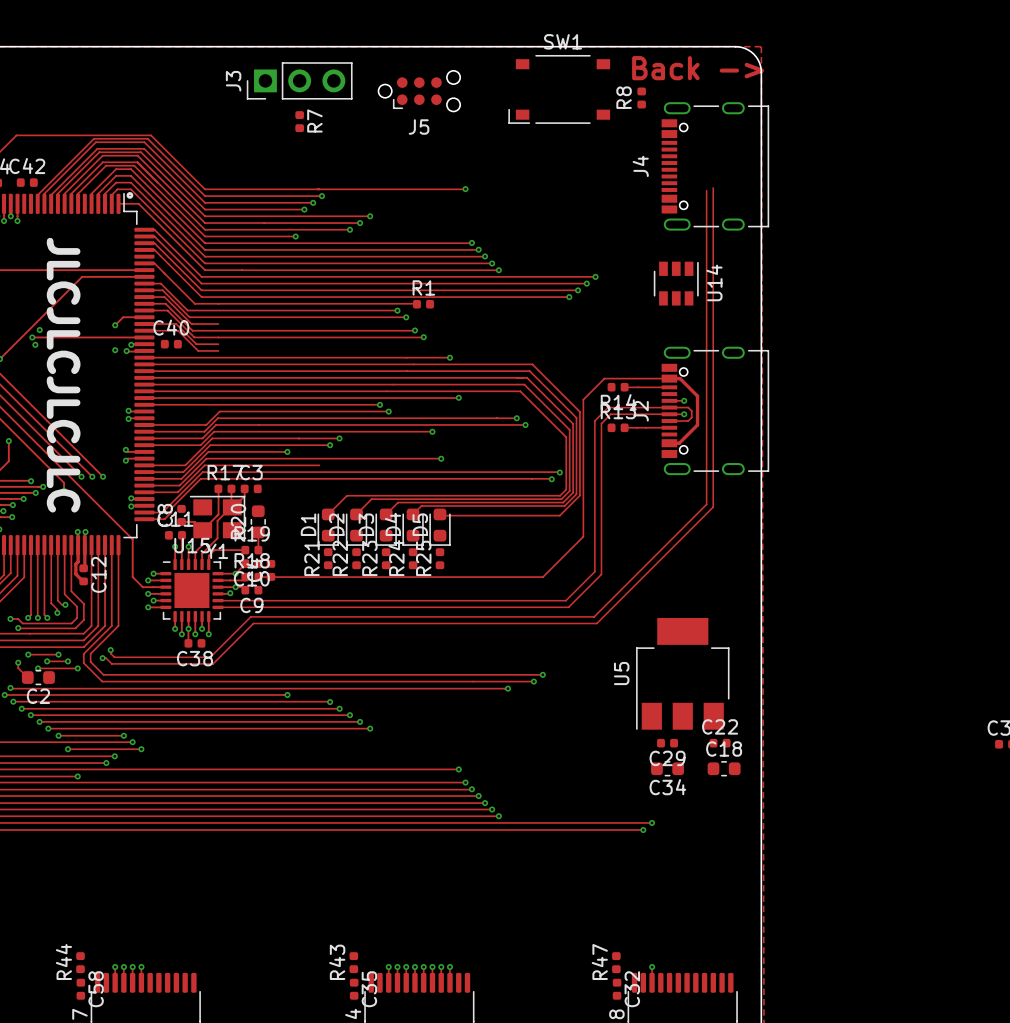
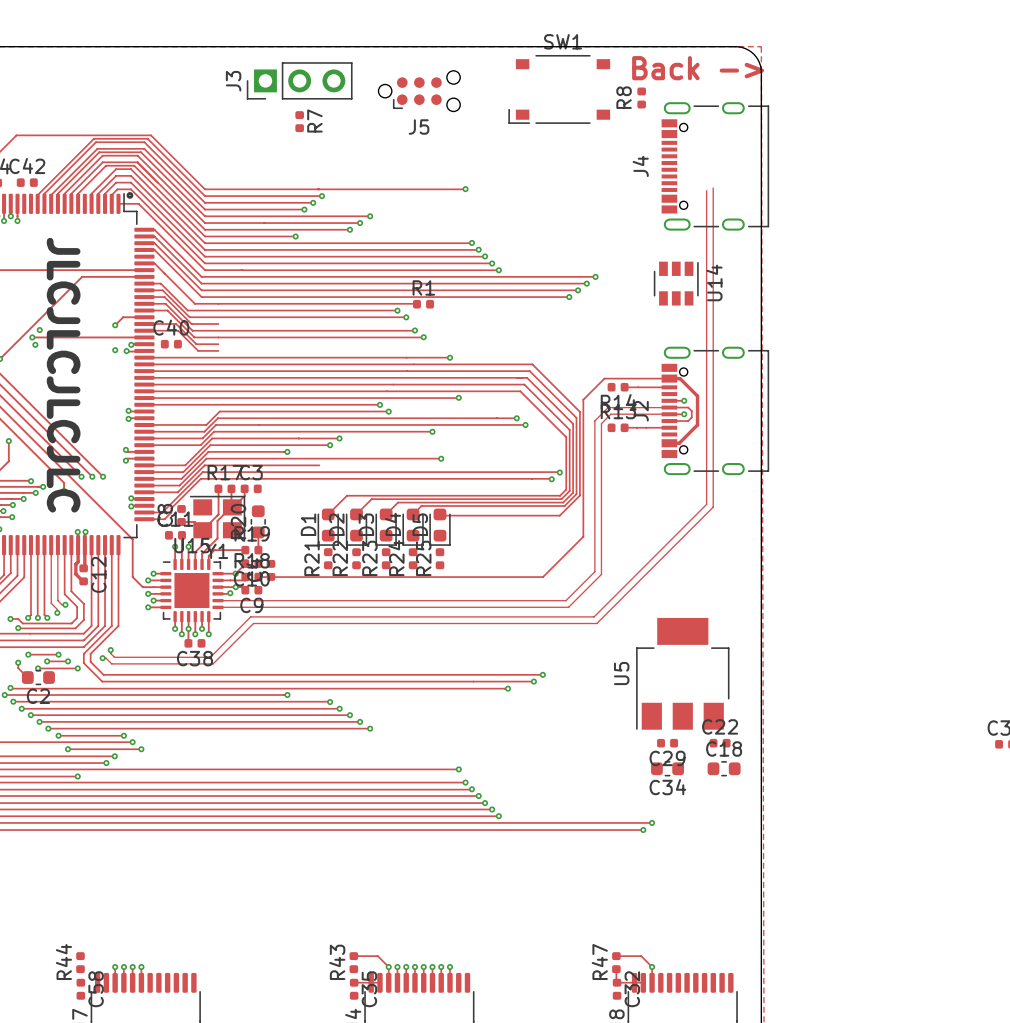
track: none -> (353, 956) (377, 956) (388, 967)
track: none -> (616, 956) (641, 956) (652, 967)
track: none -> (616, 969) (616, 981)
track: none -> (354, 982) (379, 982)
track: none -> (617, 982) (642, 982)

